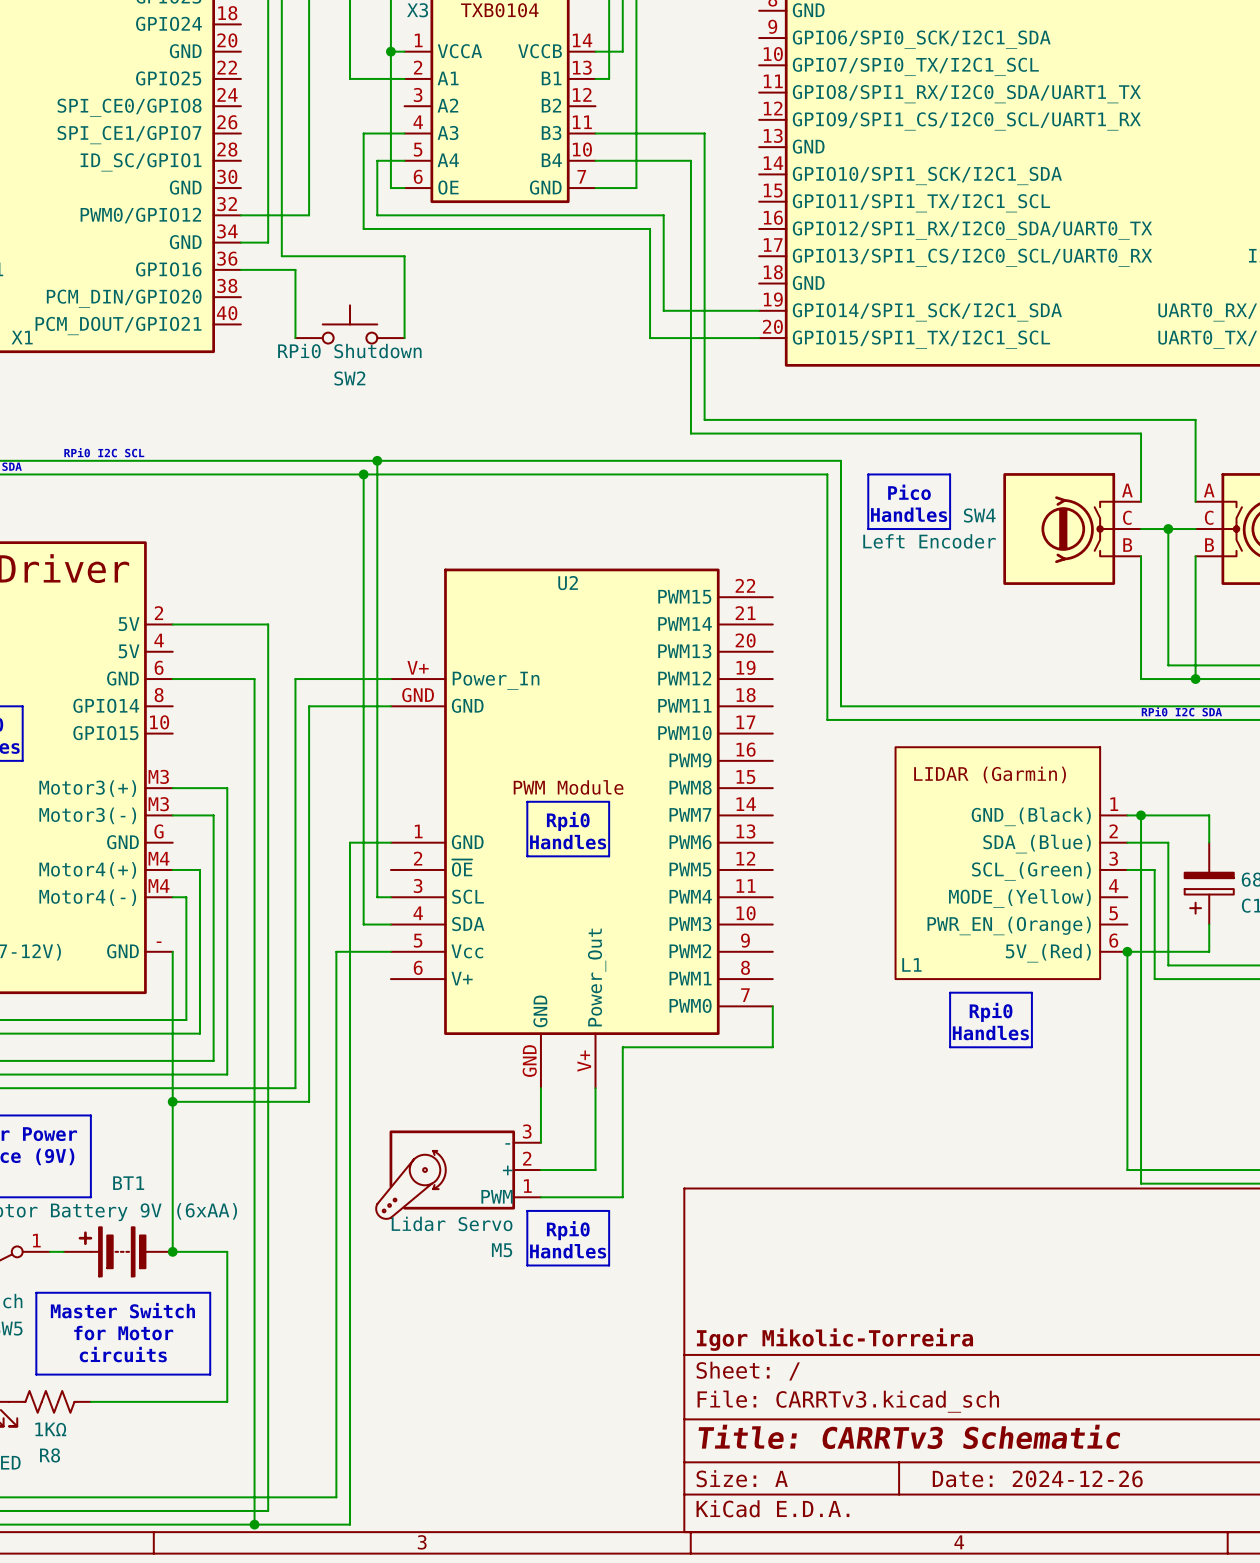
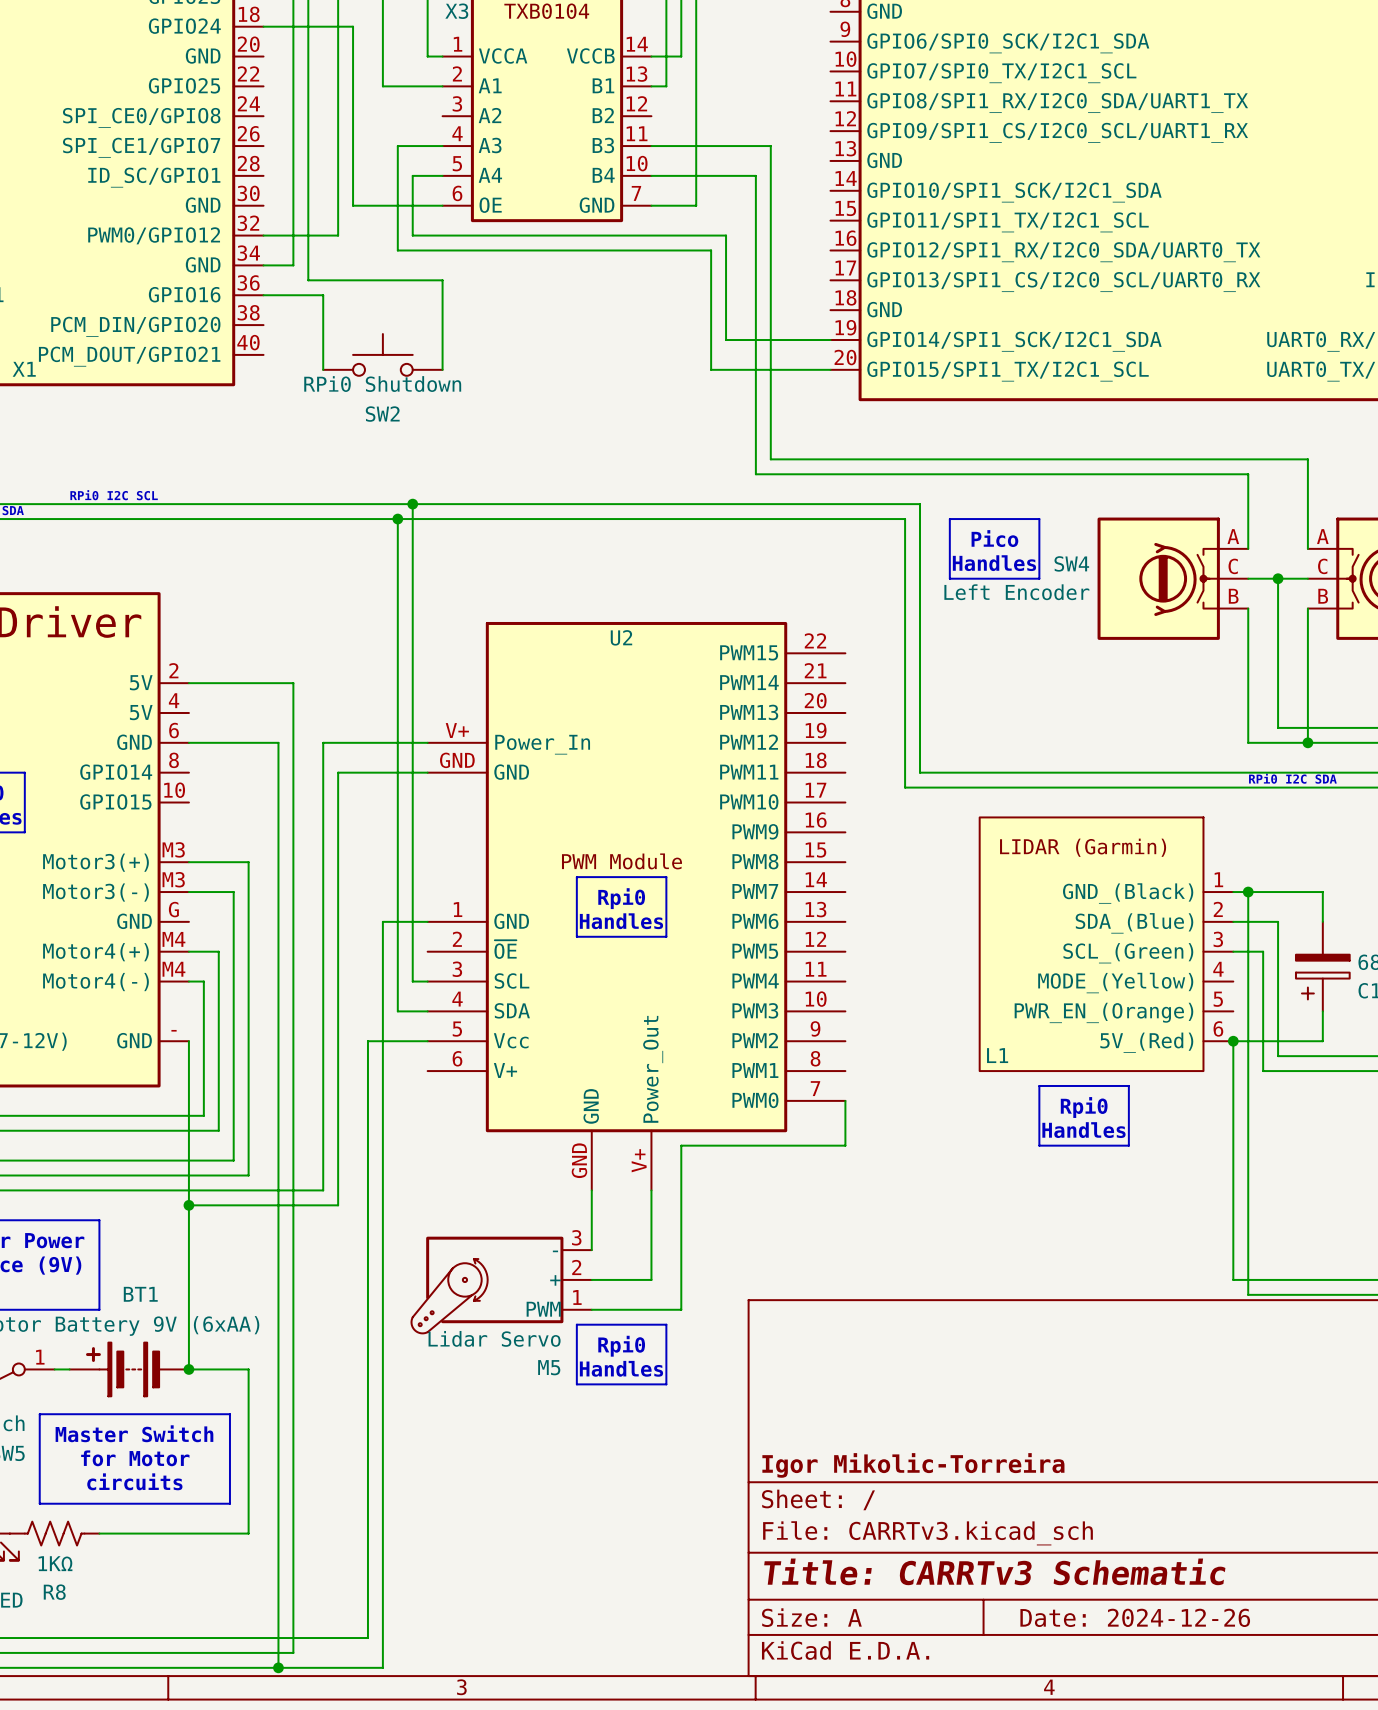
wire: (390, 51) (390, 188) -> (263, 26) (353, 26) (353, 205) (427, 205)
junction: (390, 51) -> none

